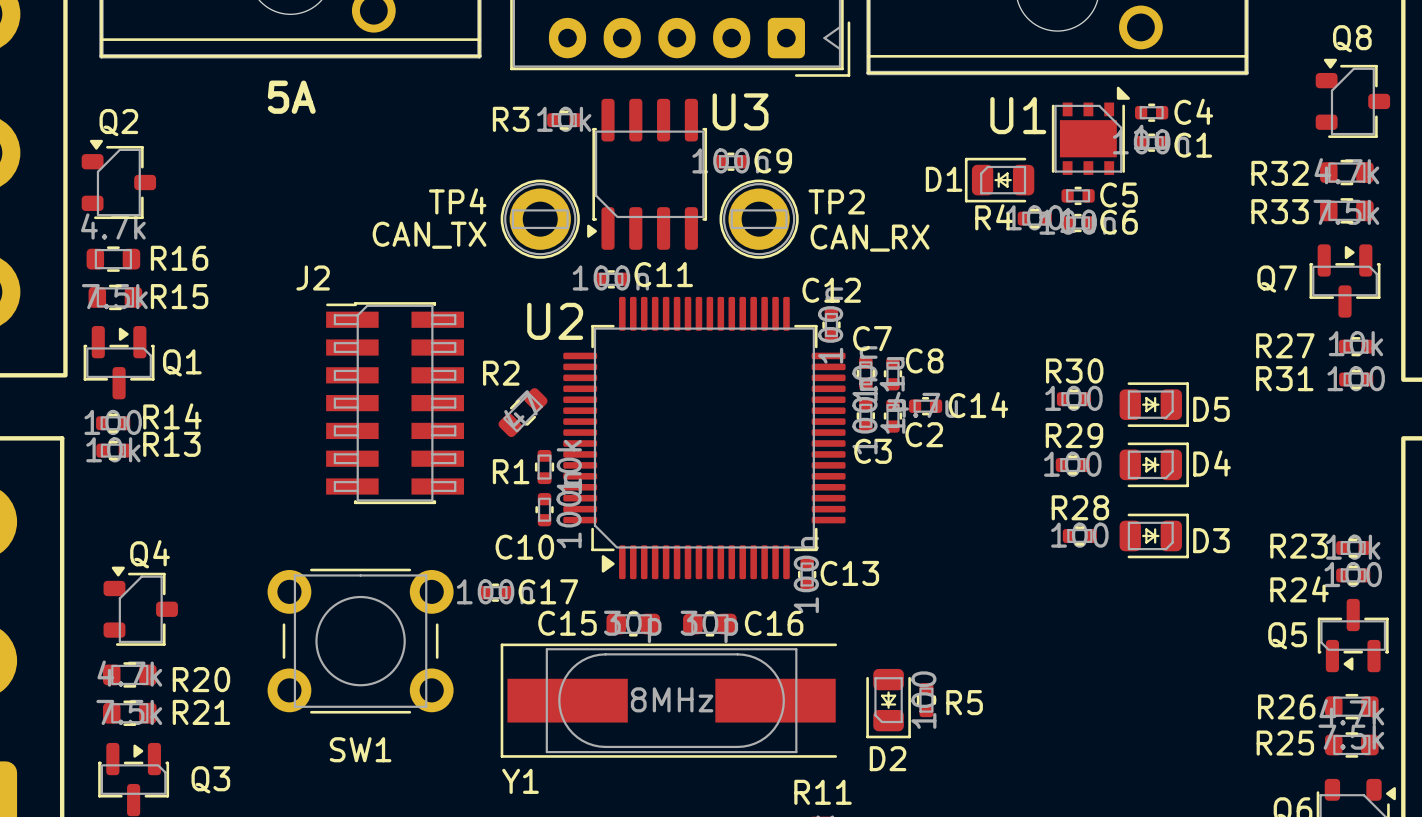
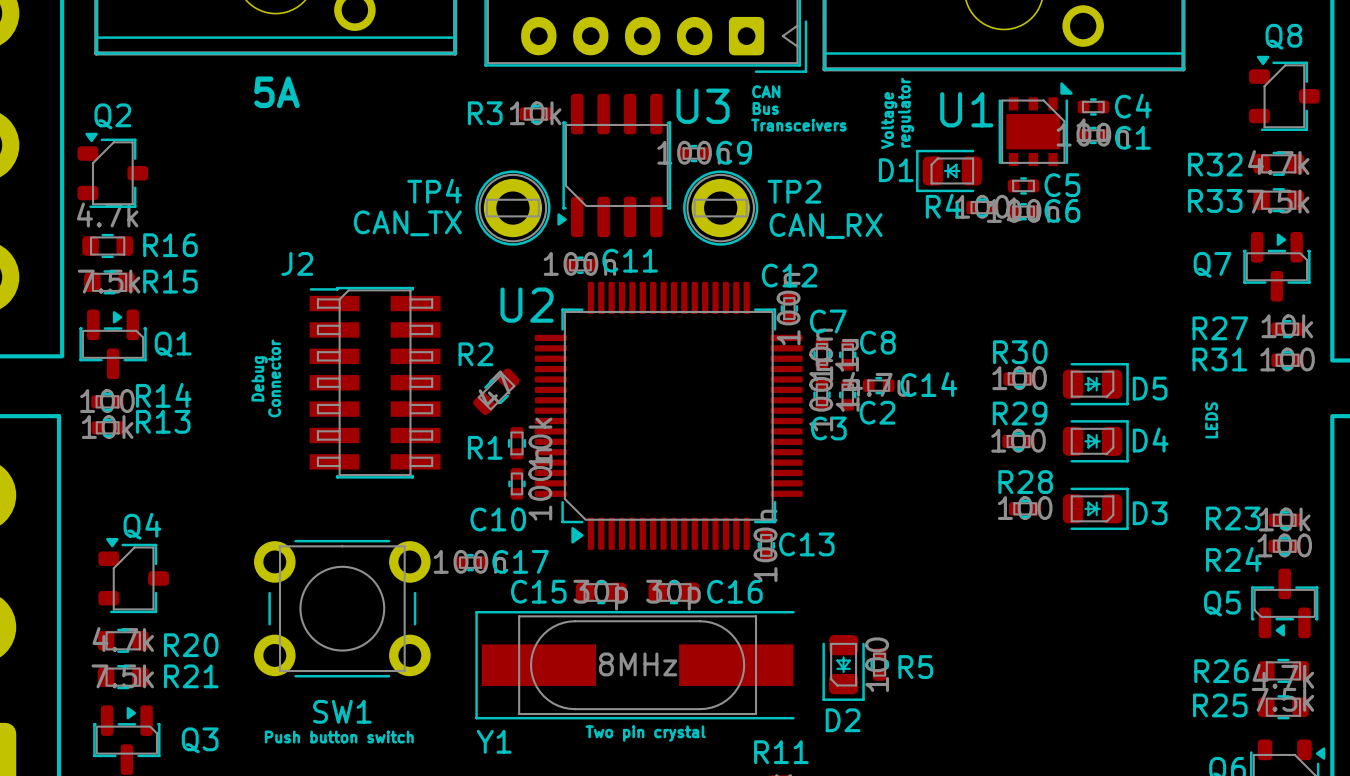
text: none -> CAN (766, 91)
text: none -> Bus (765, 108)
text: none -> regulator (905, 112)
text: none -> Voltage (889, 120)
text: none -> Transceivers (798, 125)
text: none -> Connector (274, 378)
text: none -> Debug (259, 378)
text: none -> LEDS (1211, 420)
text: none -> Two pin crystal (645, 733)
text: none -> Push button switch (339, 737)

